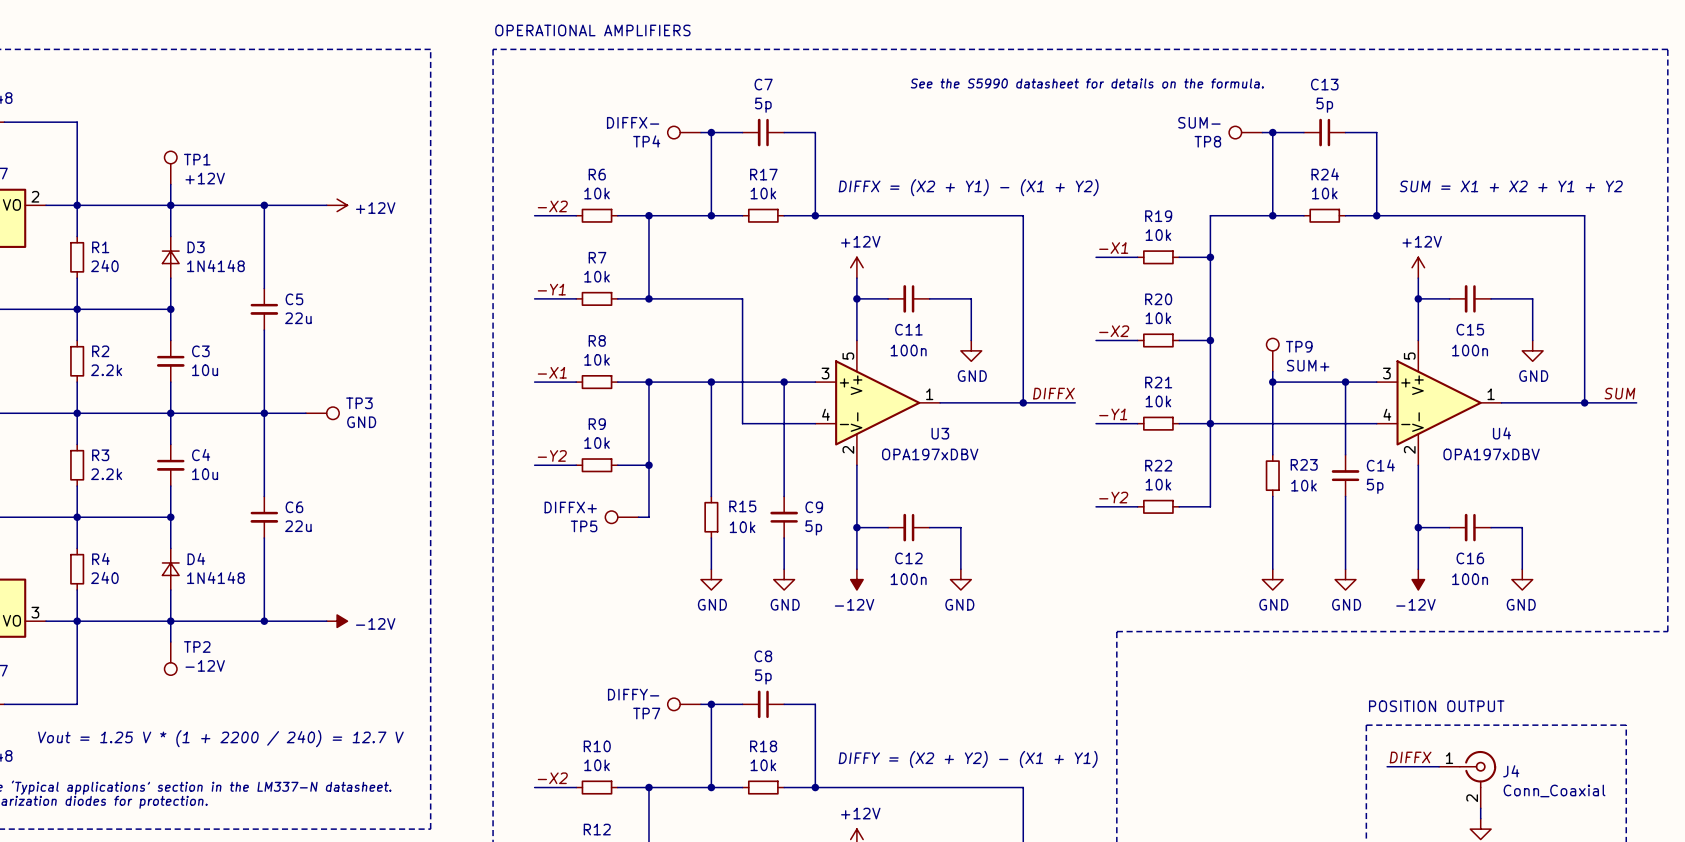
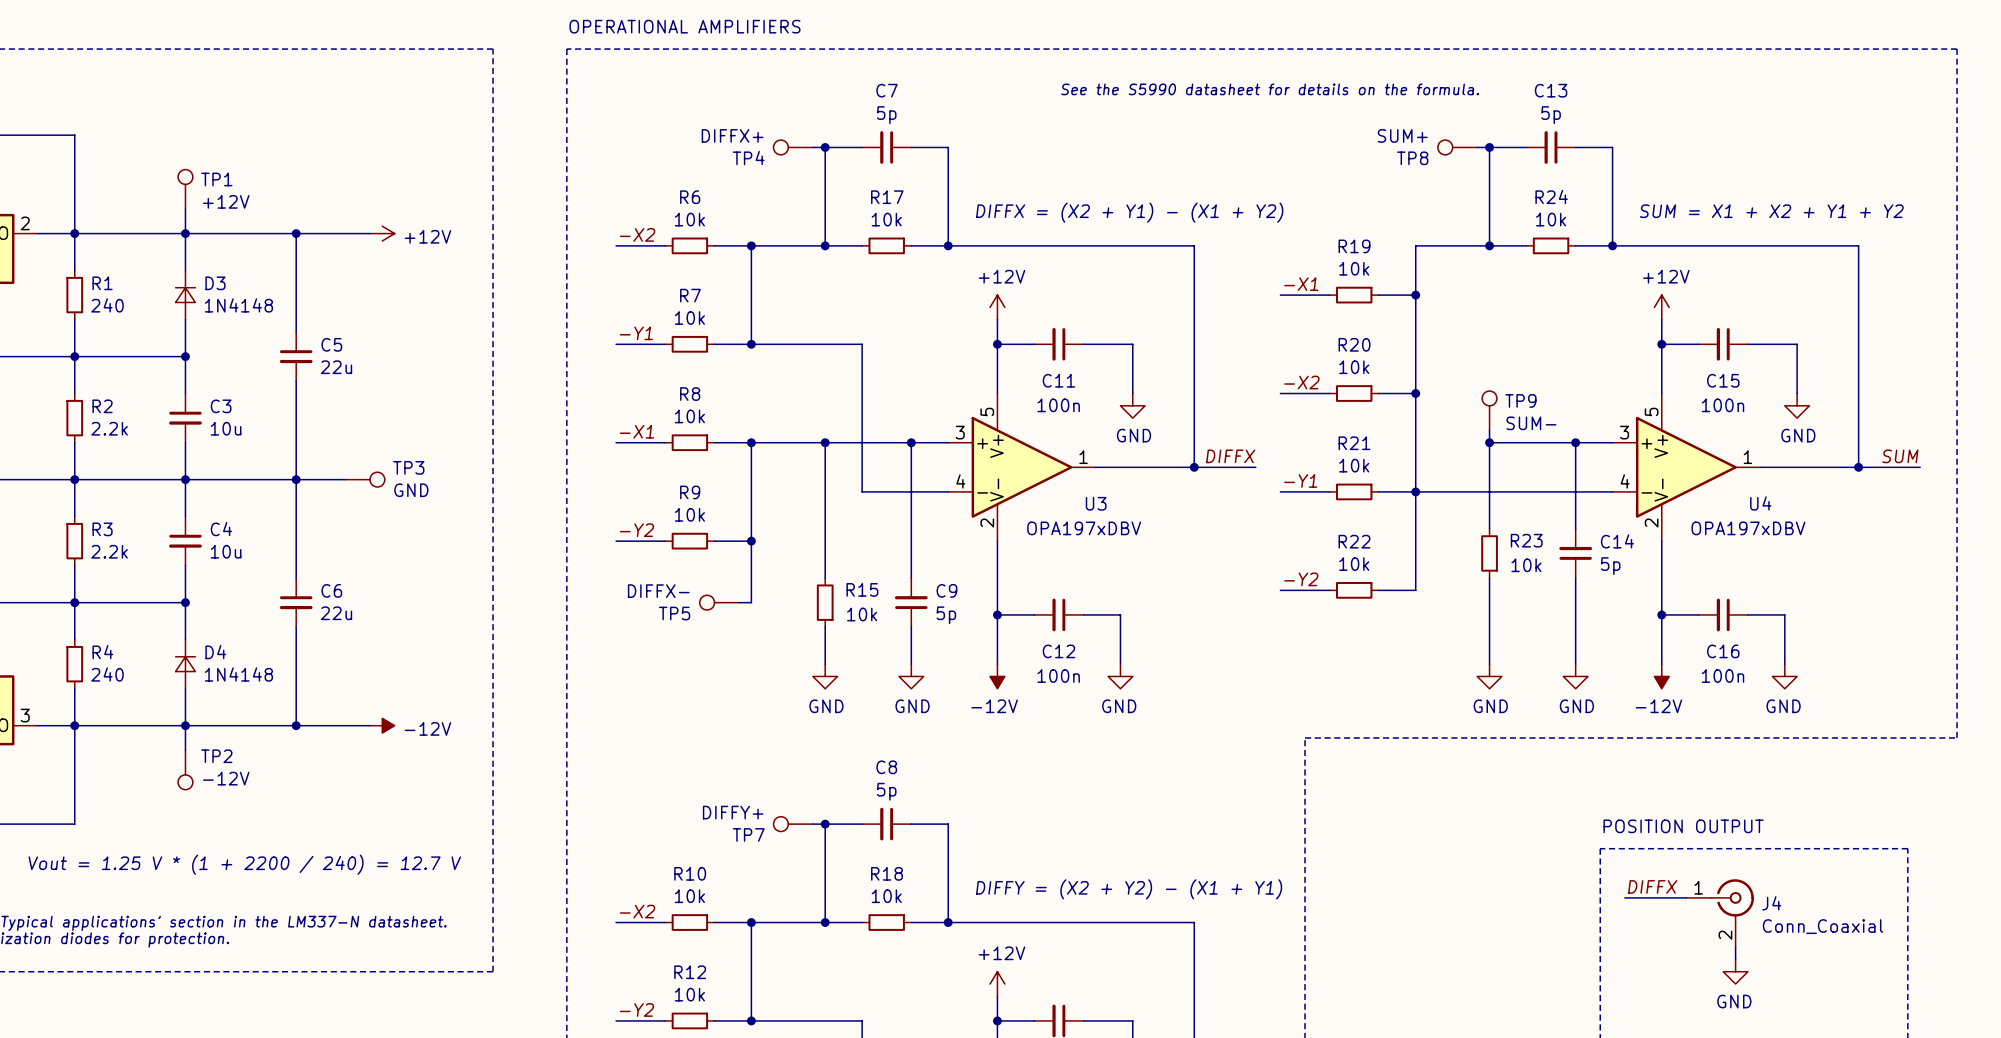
TP4 value: DIFFX- (633, 122) -> DIFFX+ (732, 135)
TP8 value: SUM- (1199, 122) -> SUM+ (1402, 135)
TP9 value: SUM+ (1308, 365) -> SUM- (1531, 423)
TP5 value: DIFFX+ (570, 507) -> DIFFX- (658, 591)
TP7 value: DIFFY- (633, 694) -> DIFFY+ (733, 812)

